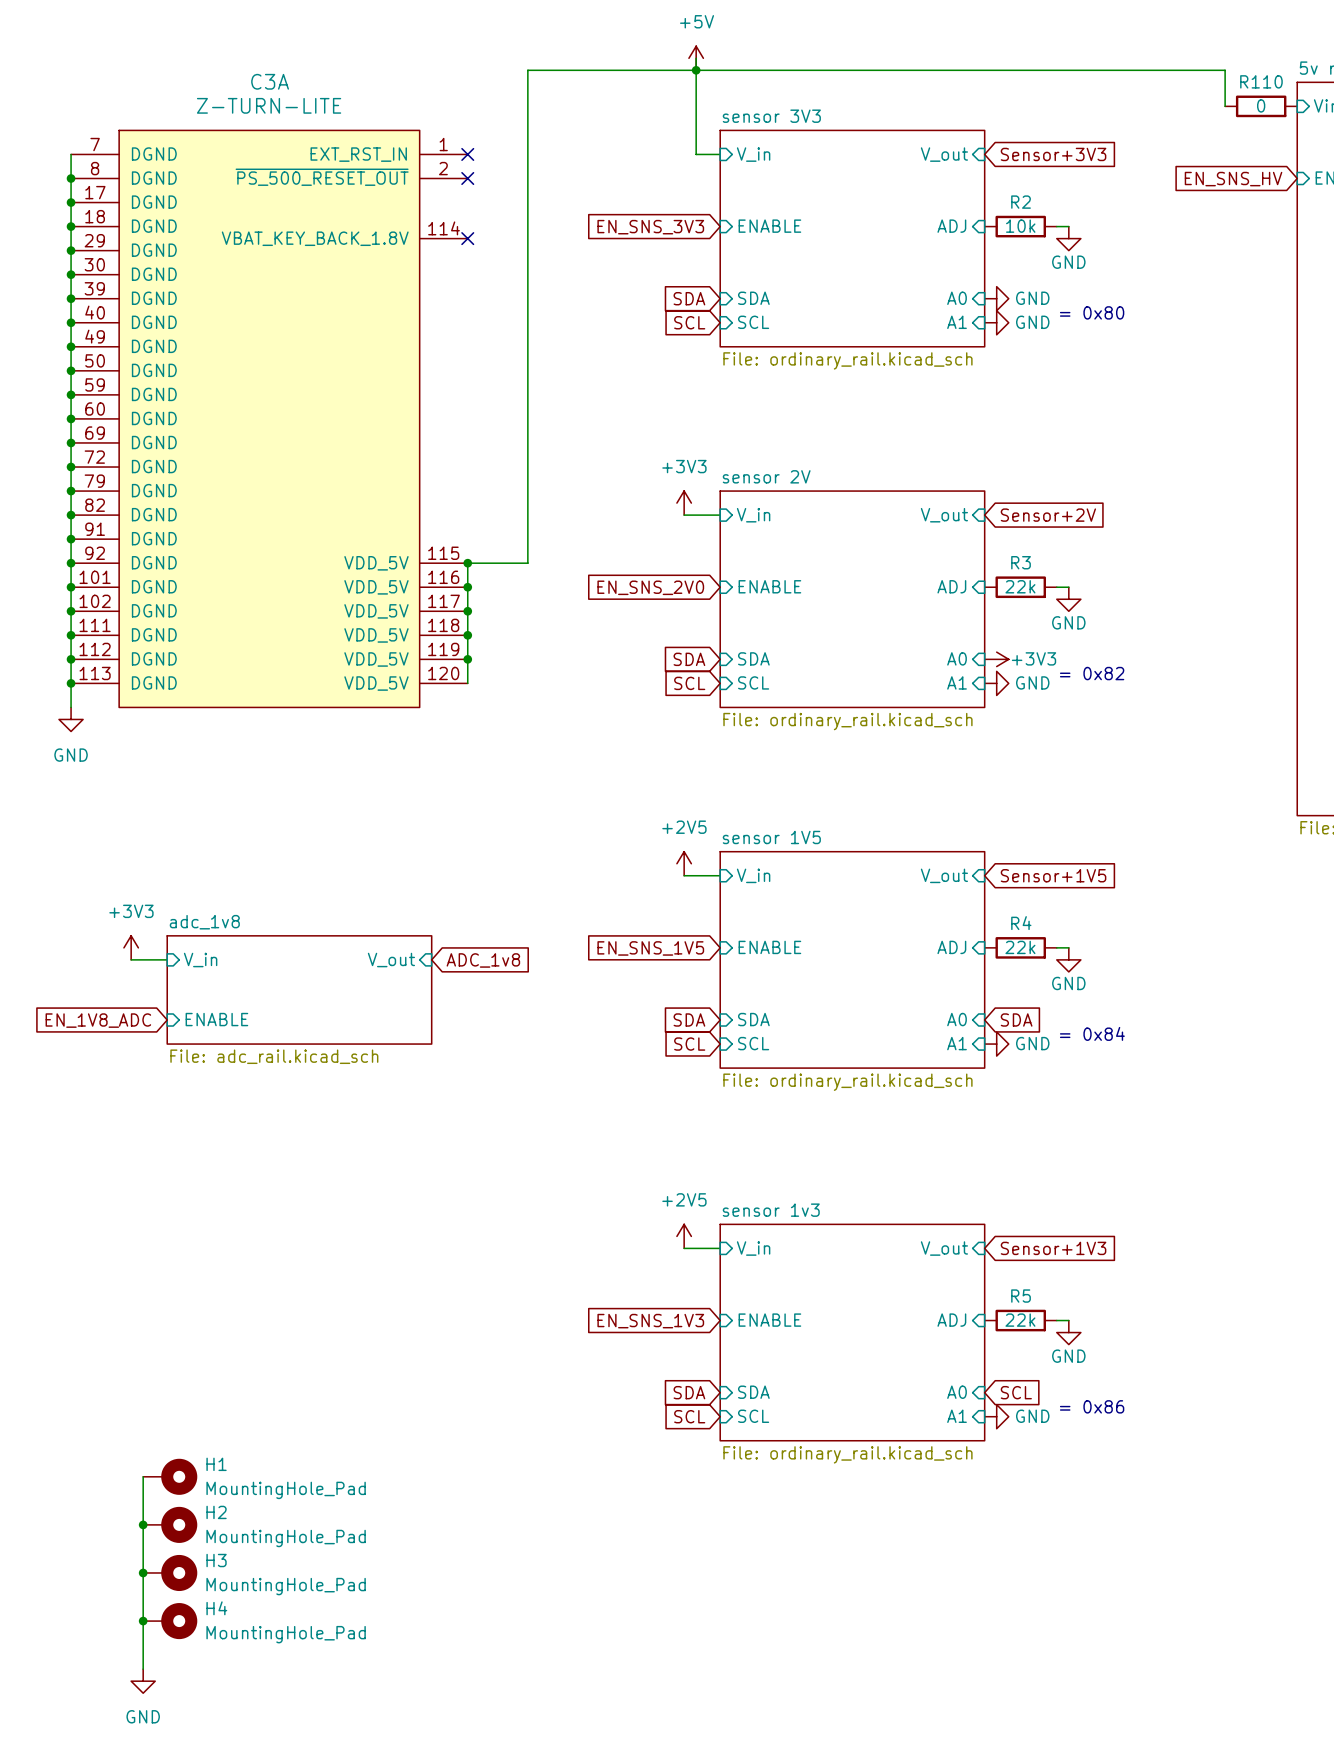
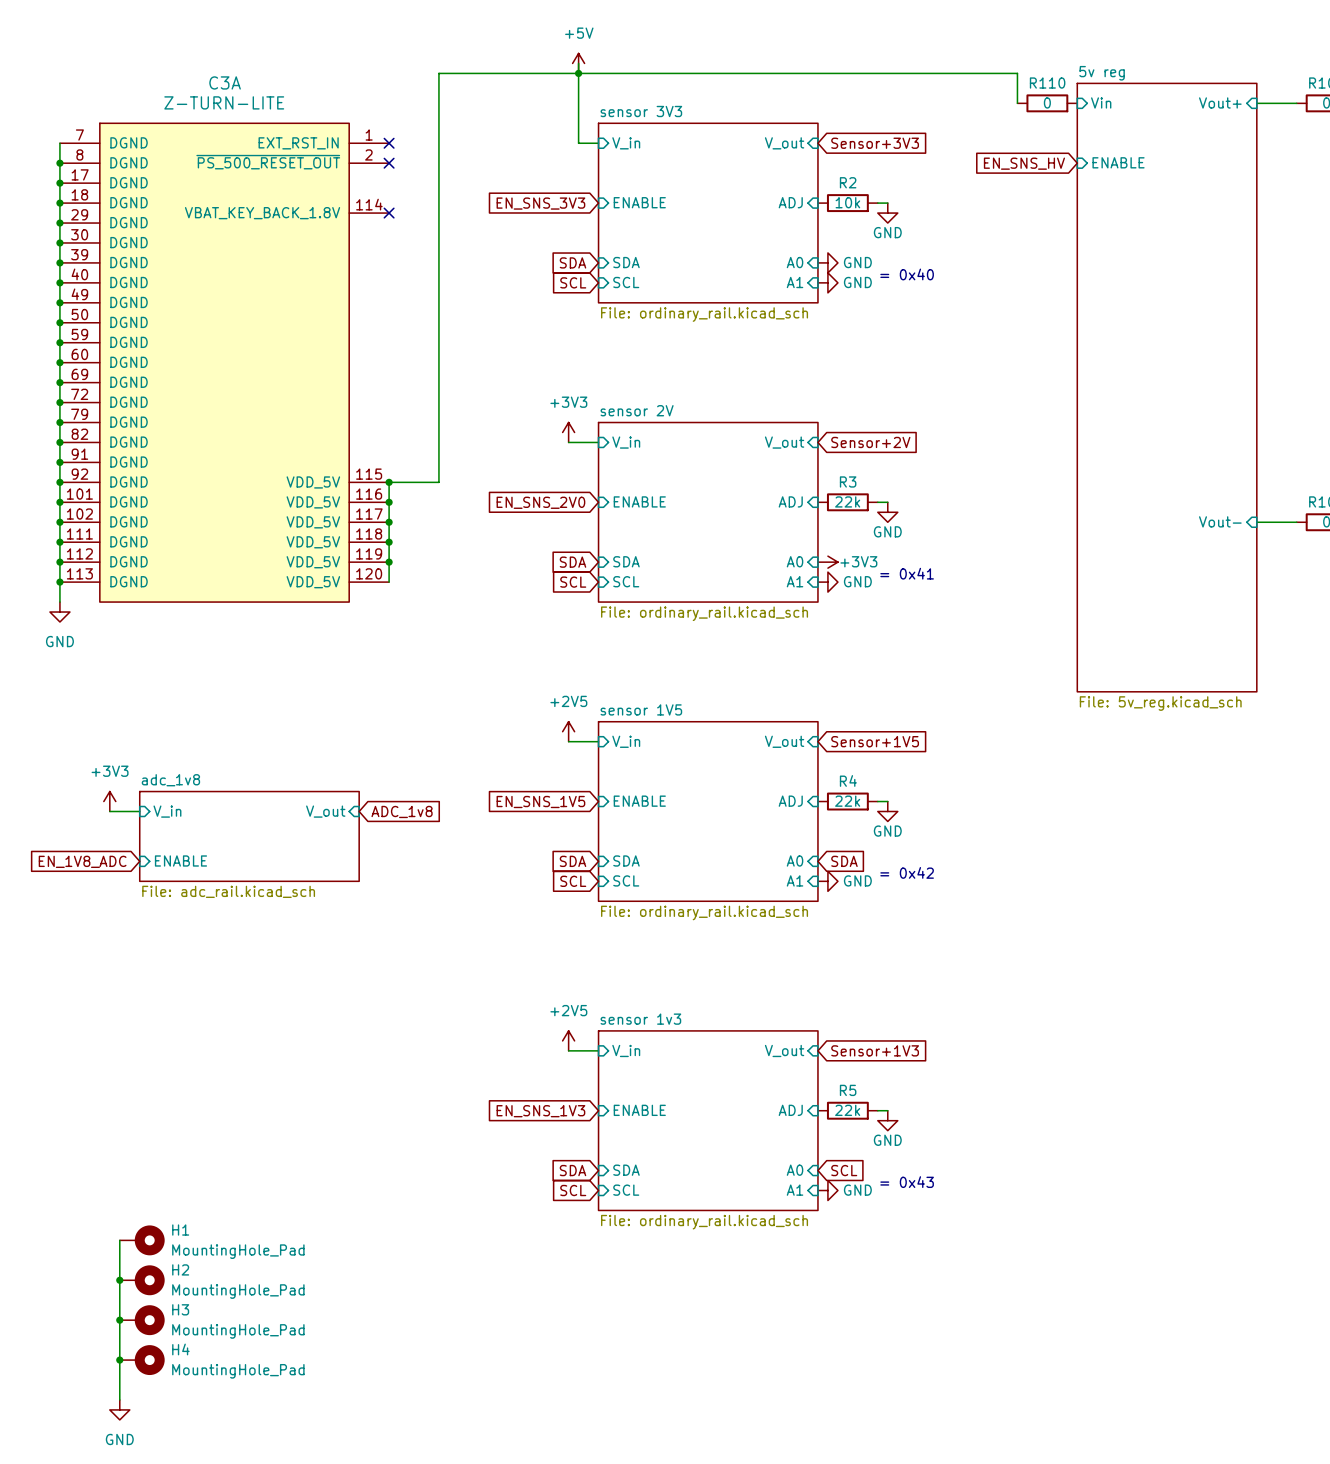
text: = 0x80 (1092, 312) -> = 0x40 (907, 274)
text: = 0x82 (1092, 673) -> = 0x41 (907, 573)
text: = 0x84 (1092, 1033) -> = 0x42 (907, 872)
text: = 0x86 (1092, 1406) -> = 0x43 (907, 1182)

